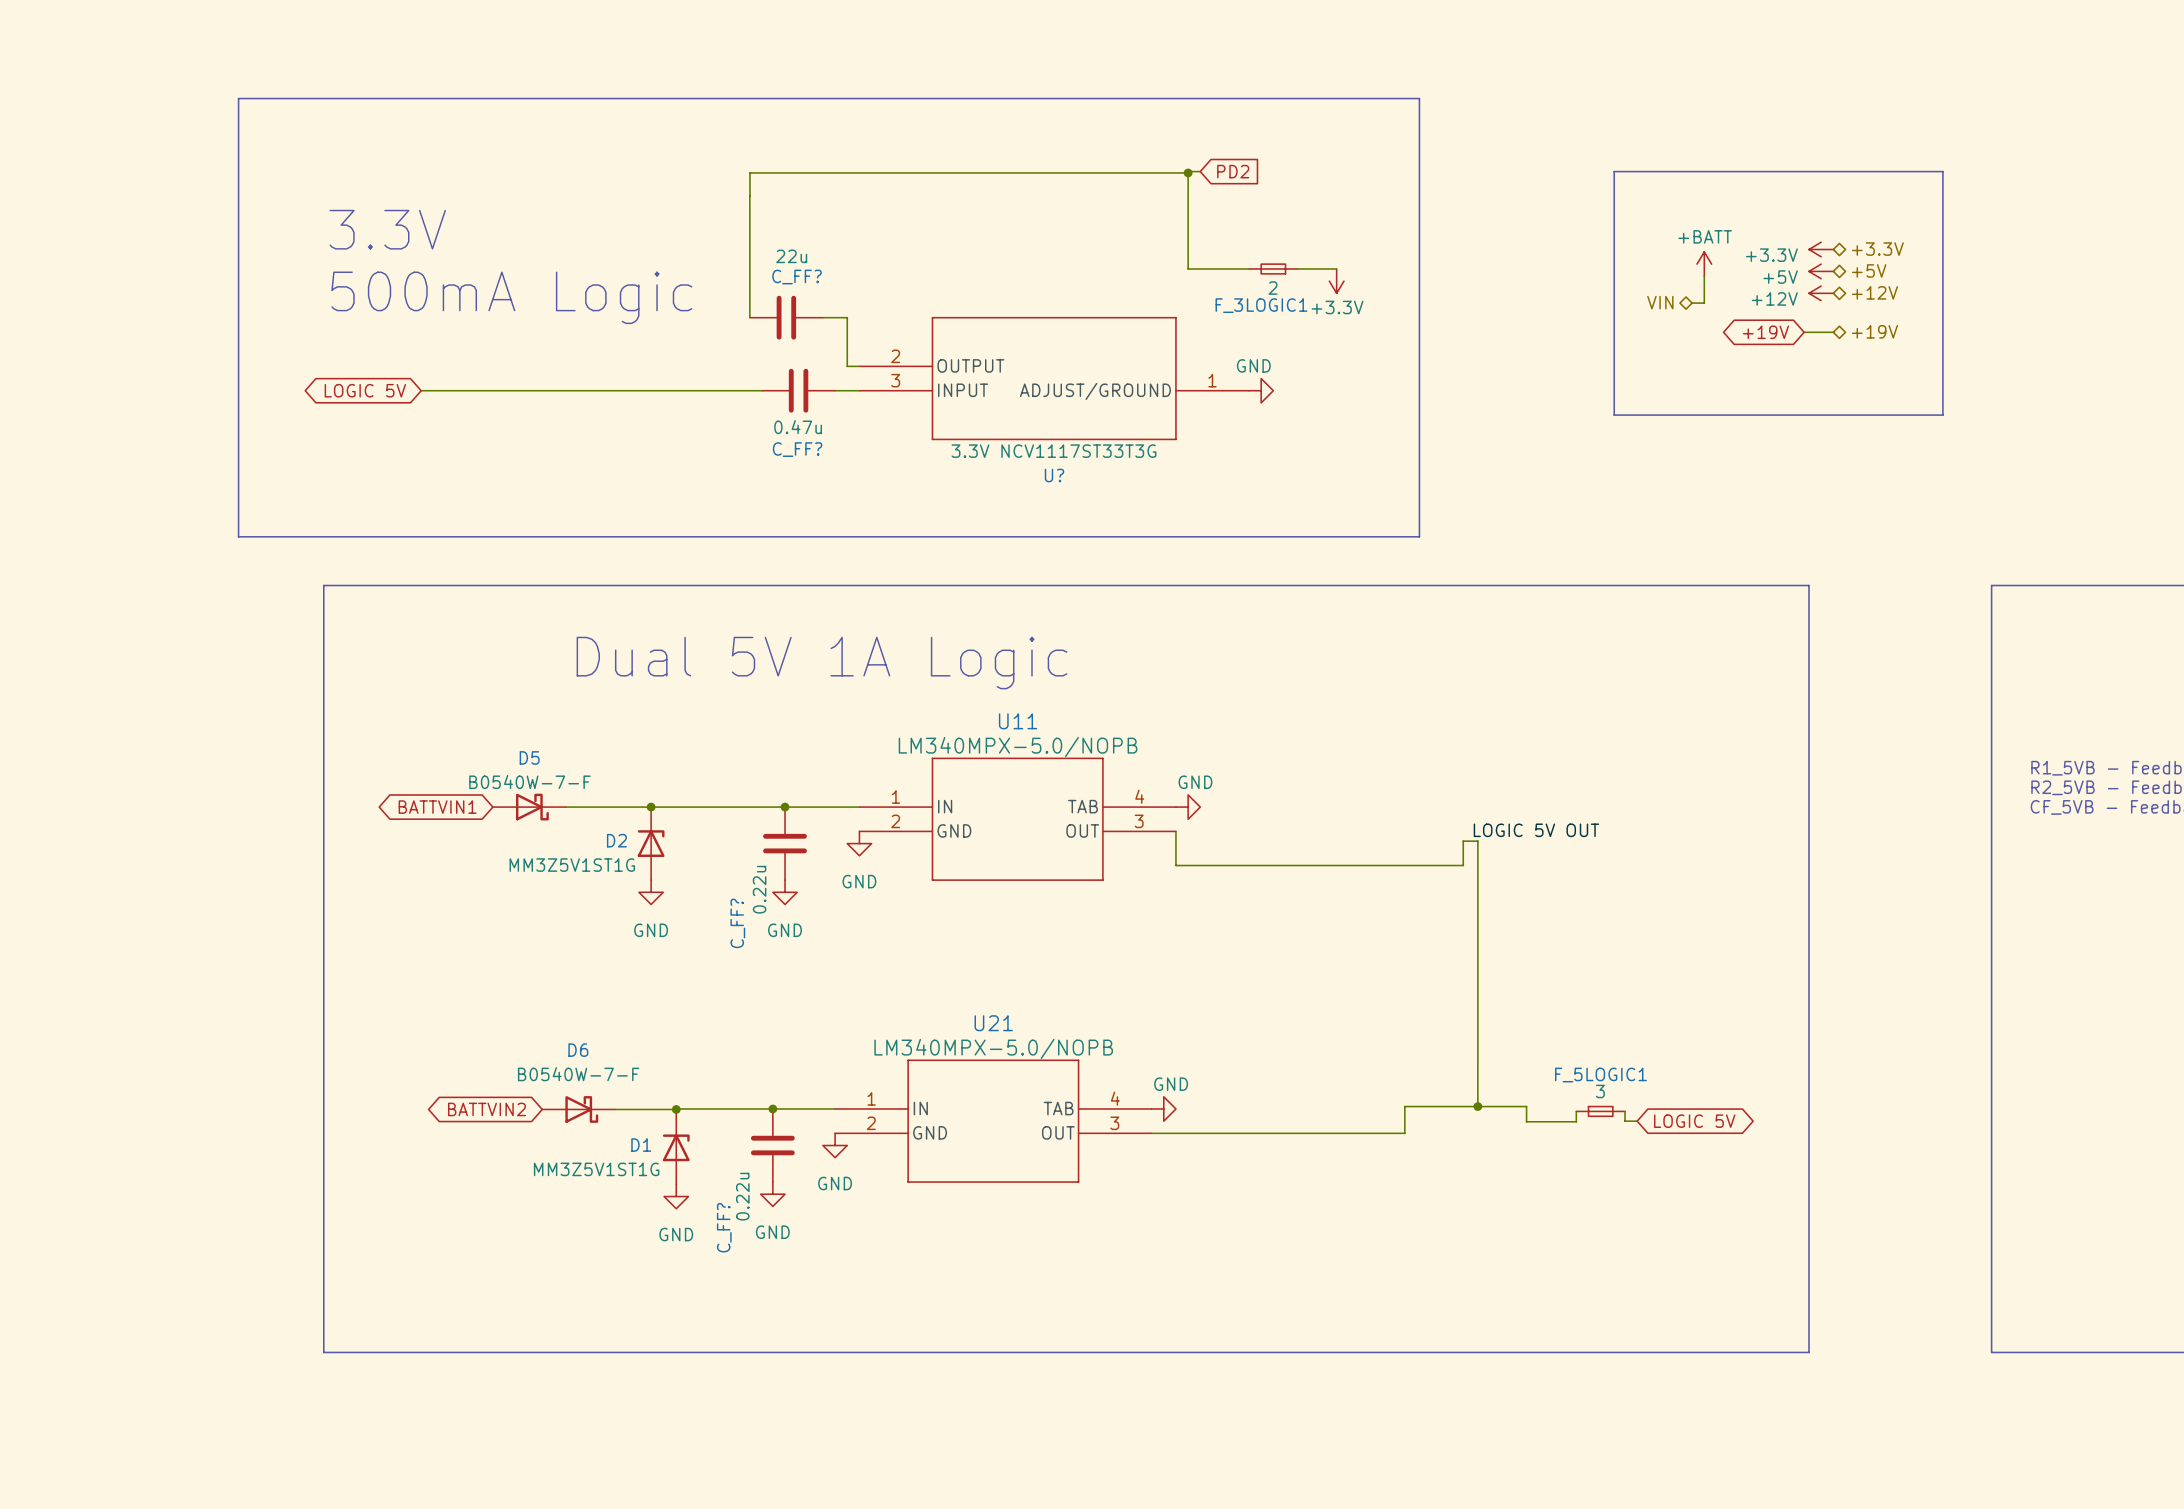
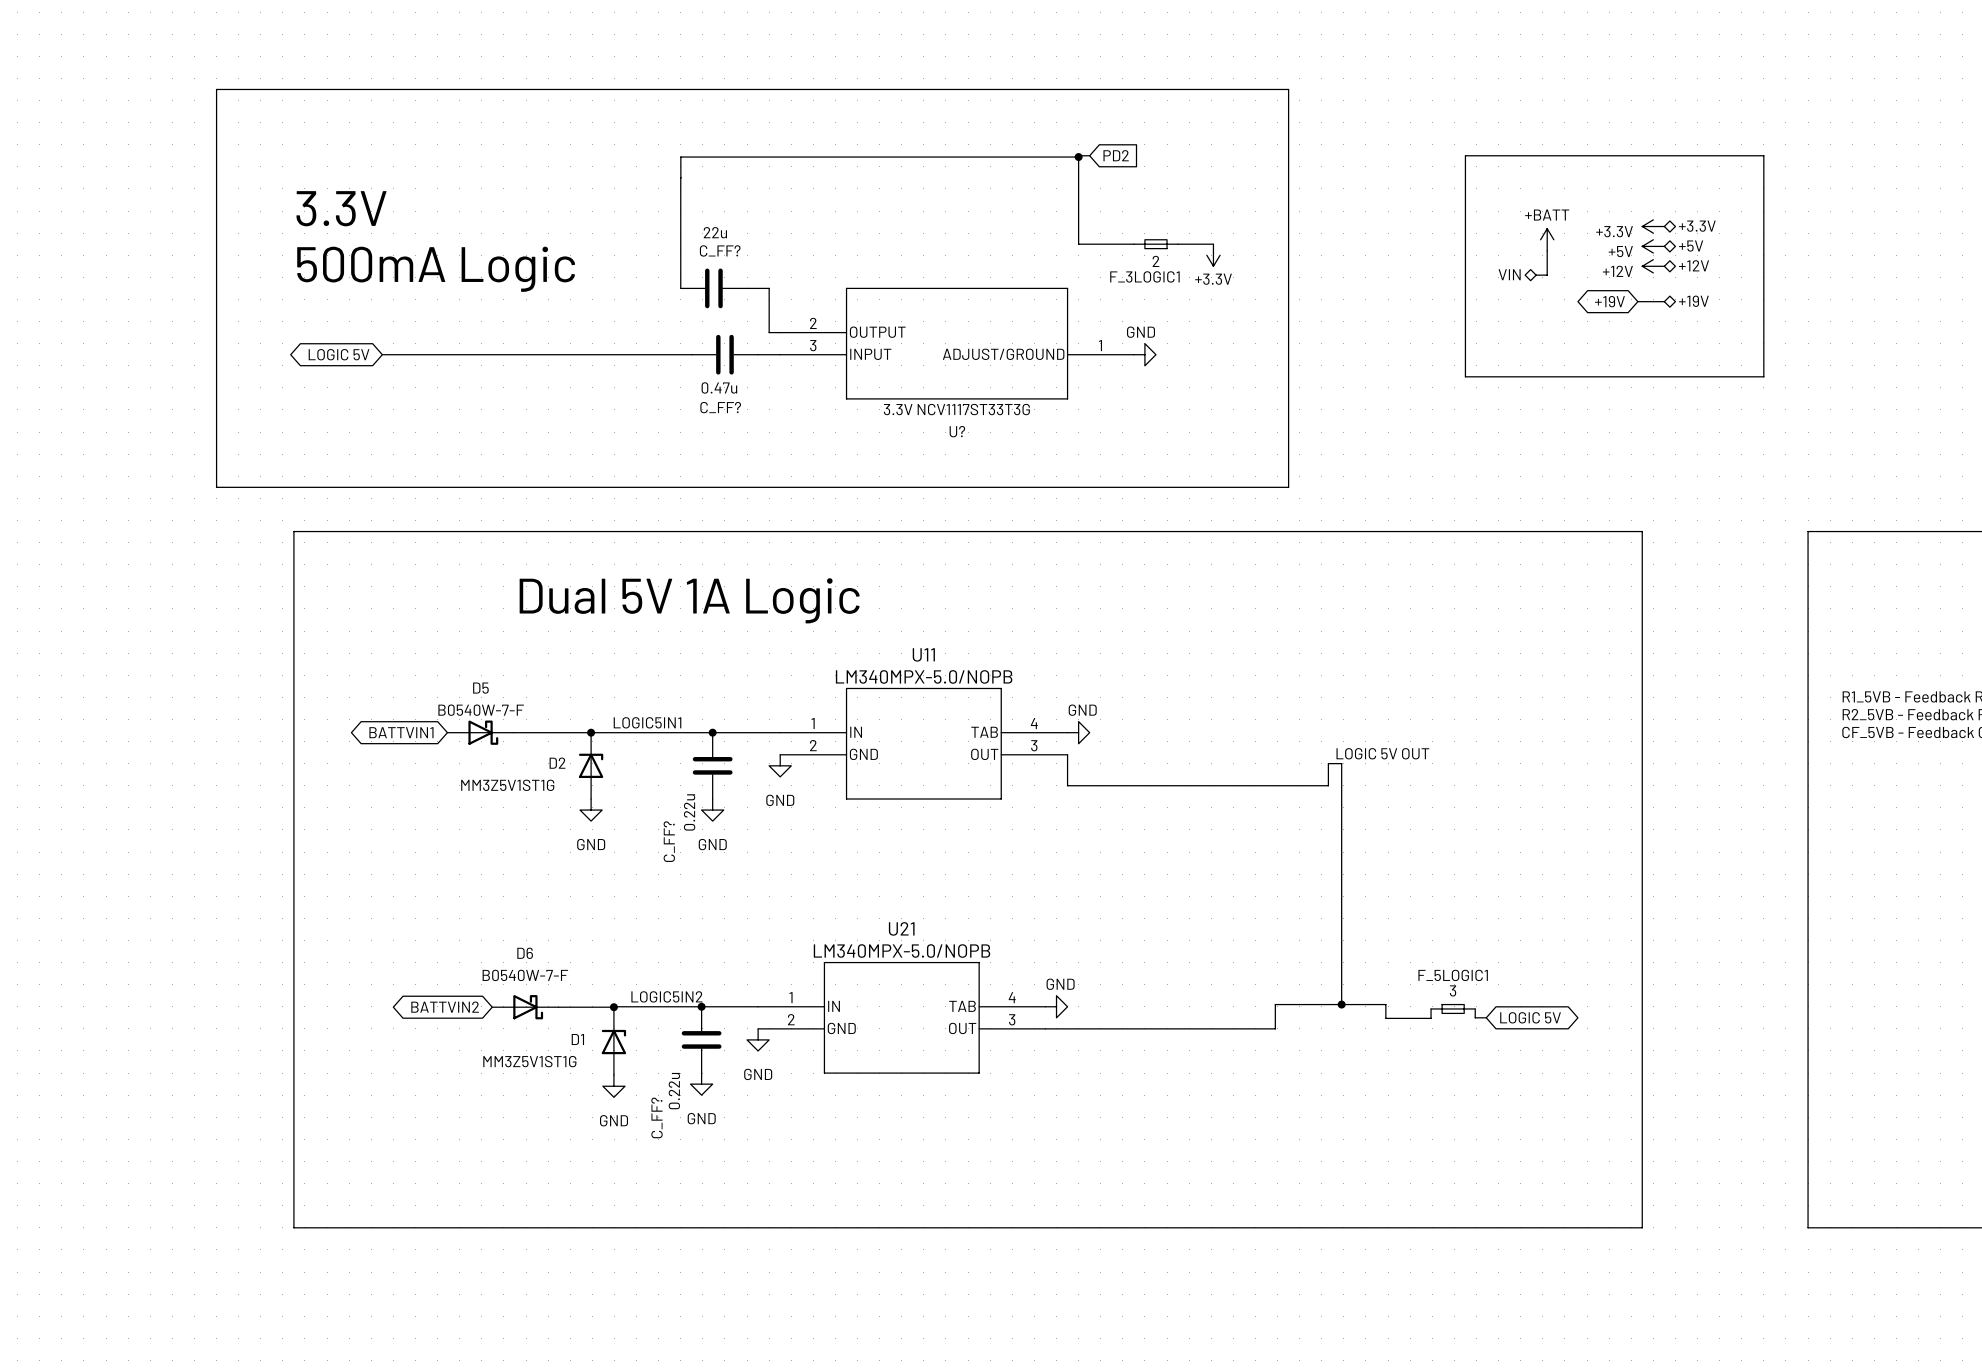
label: none -> LOGIC5IN1 (647, 722)
label: none -> LOGIC5IN2 (666, 996)

